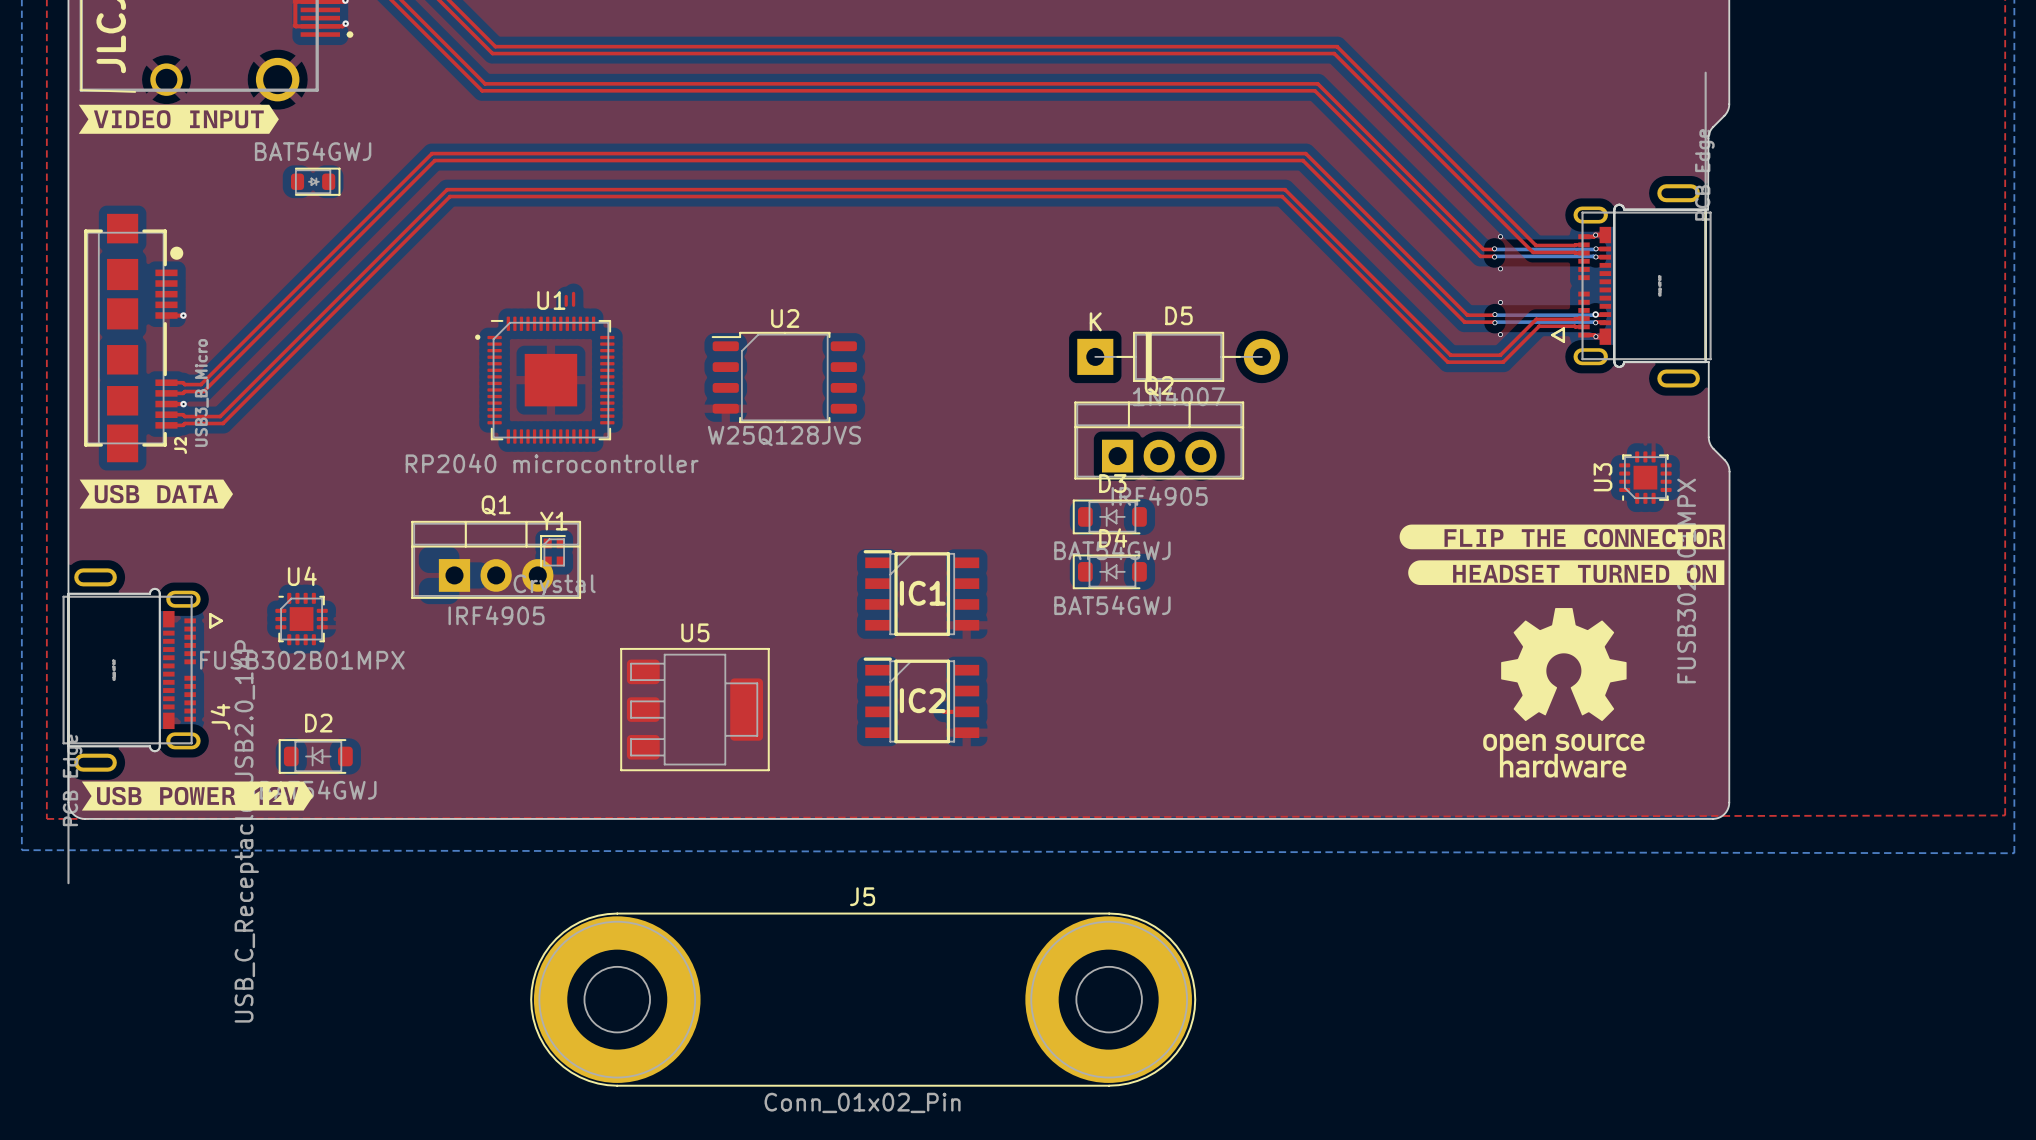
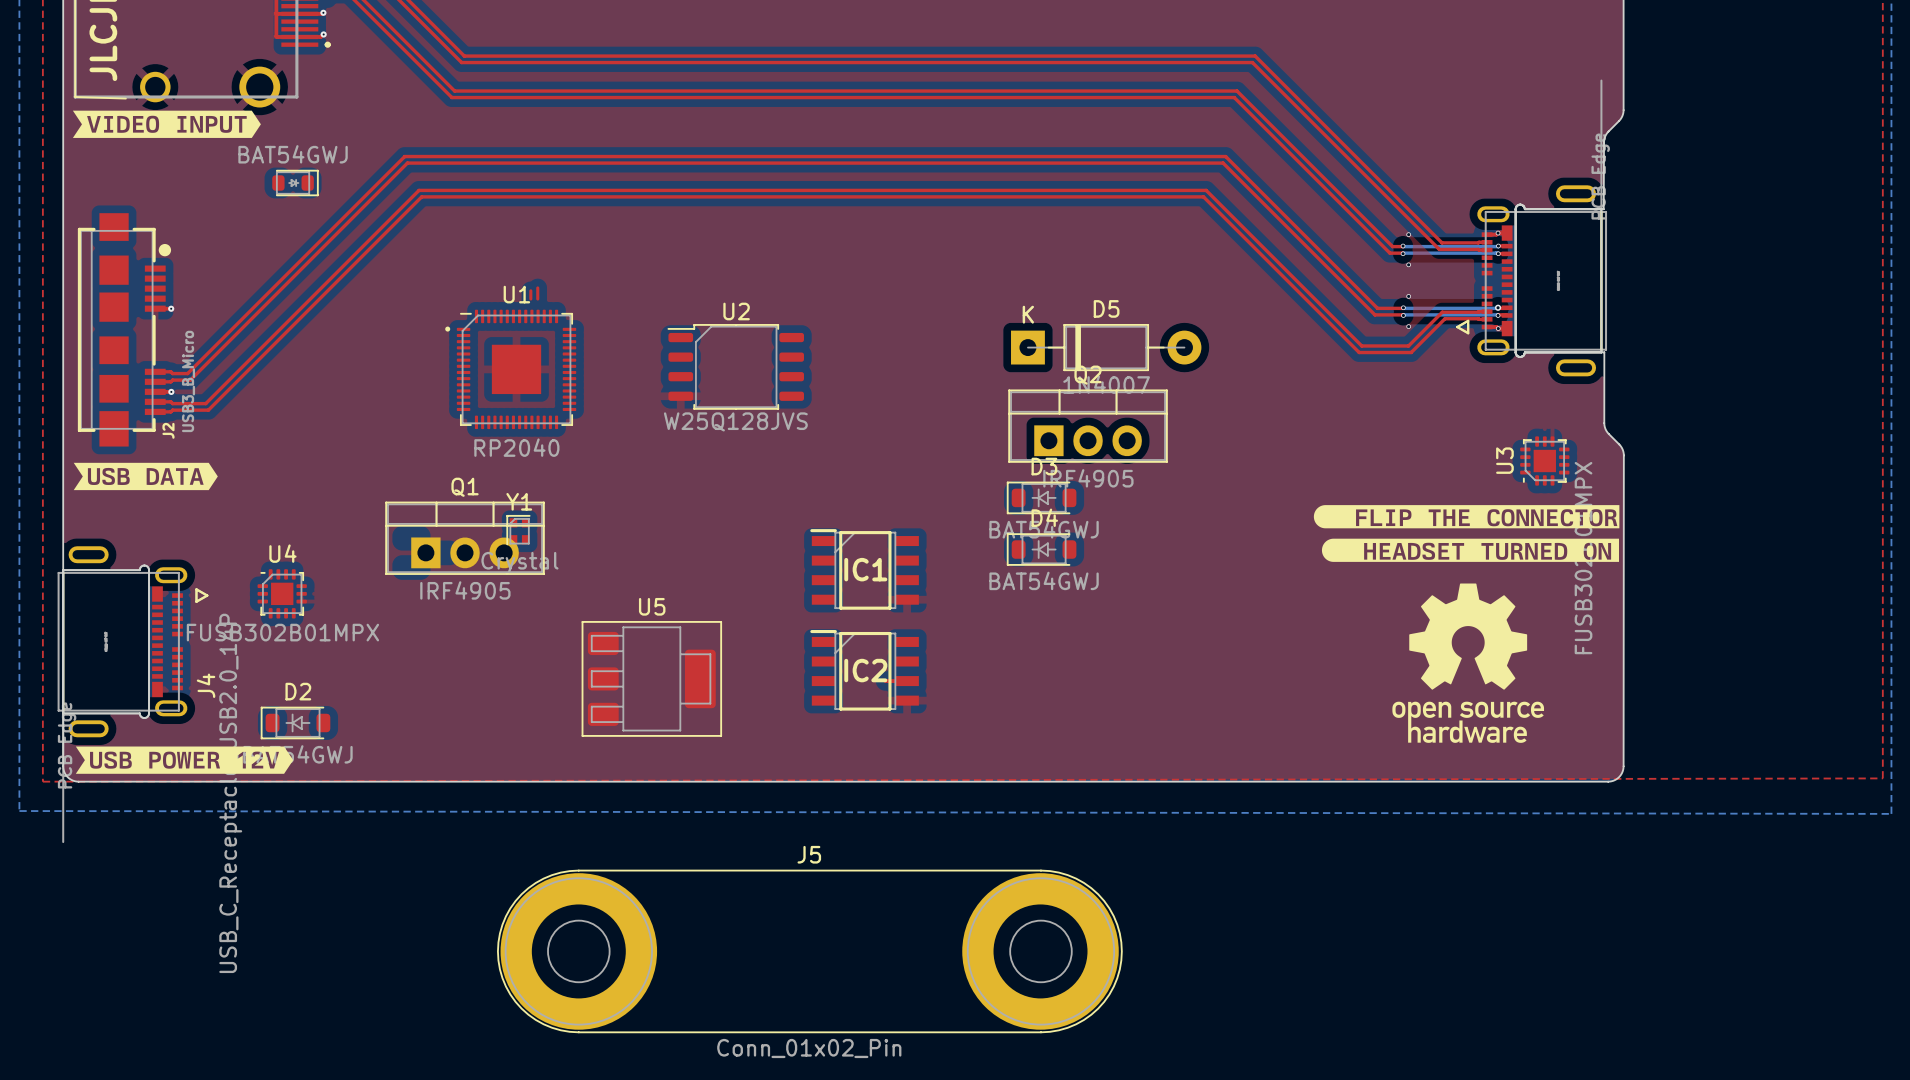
U1 value: RP2040 microcontroller (552, 463) -> RP2040 (516, 447)

